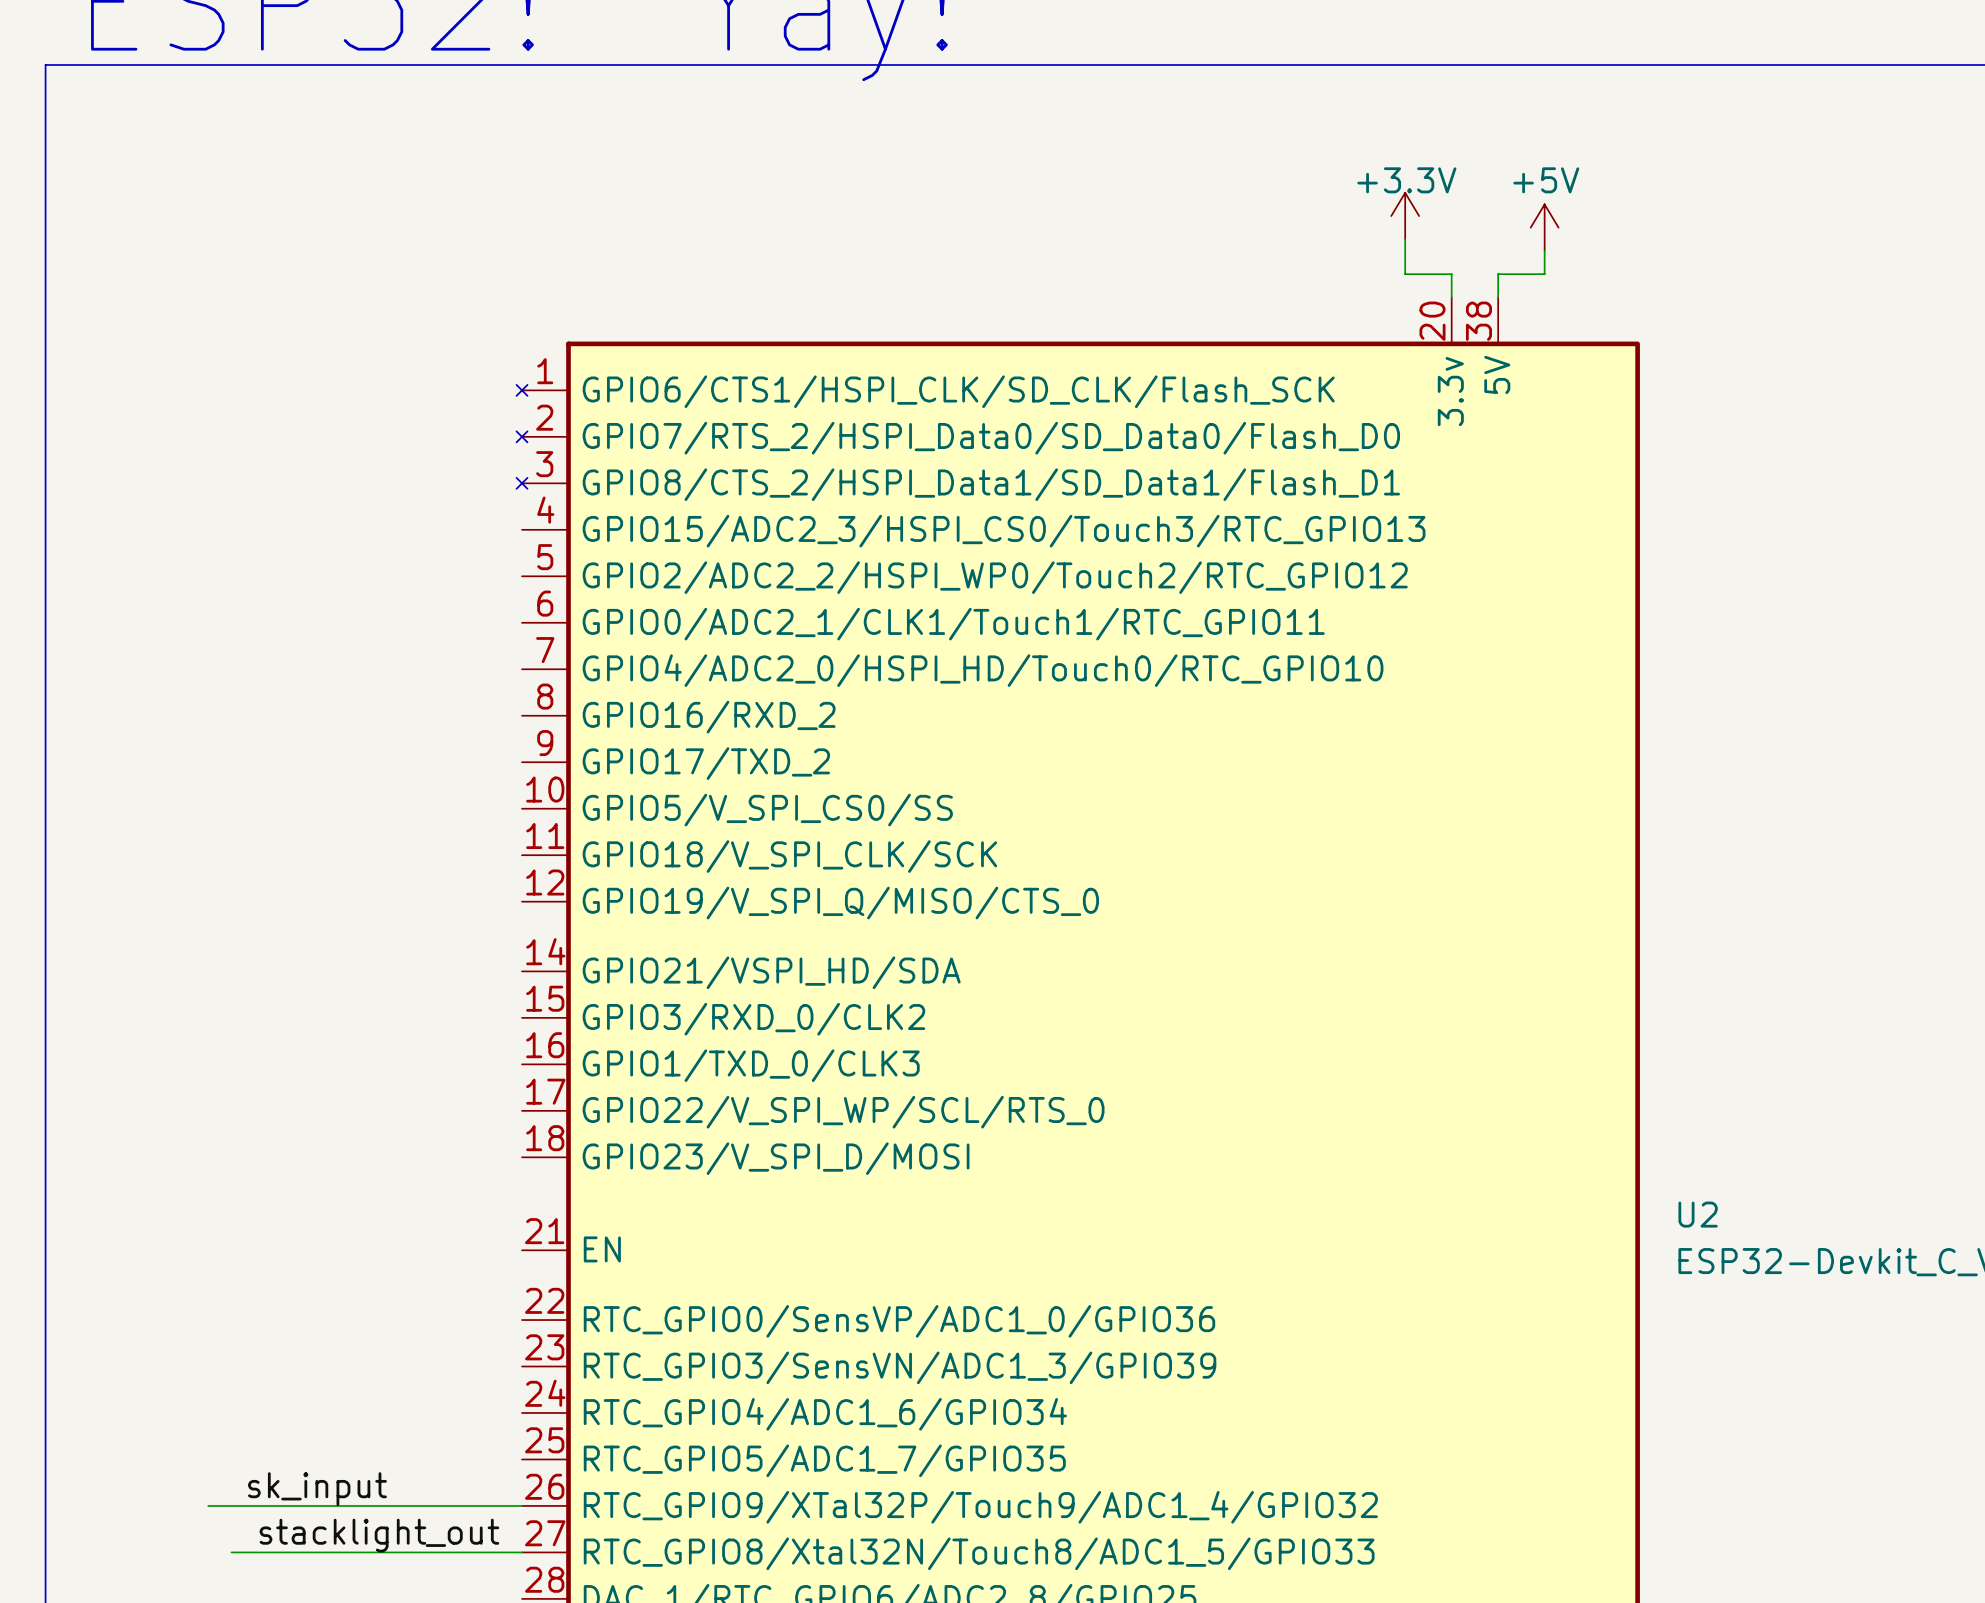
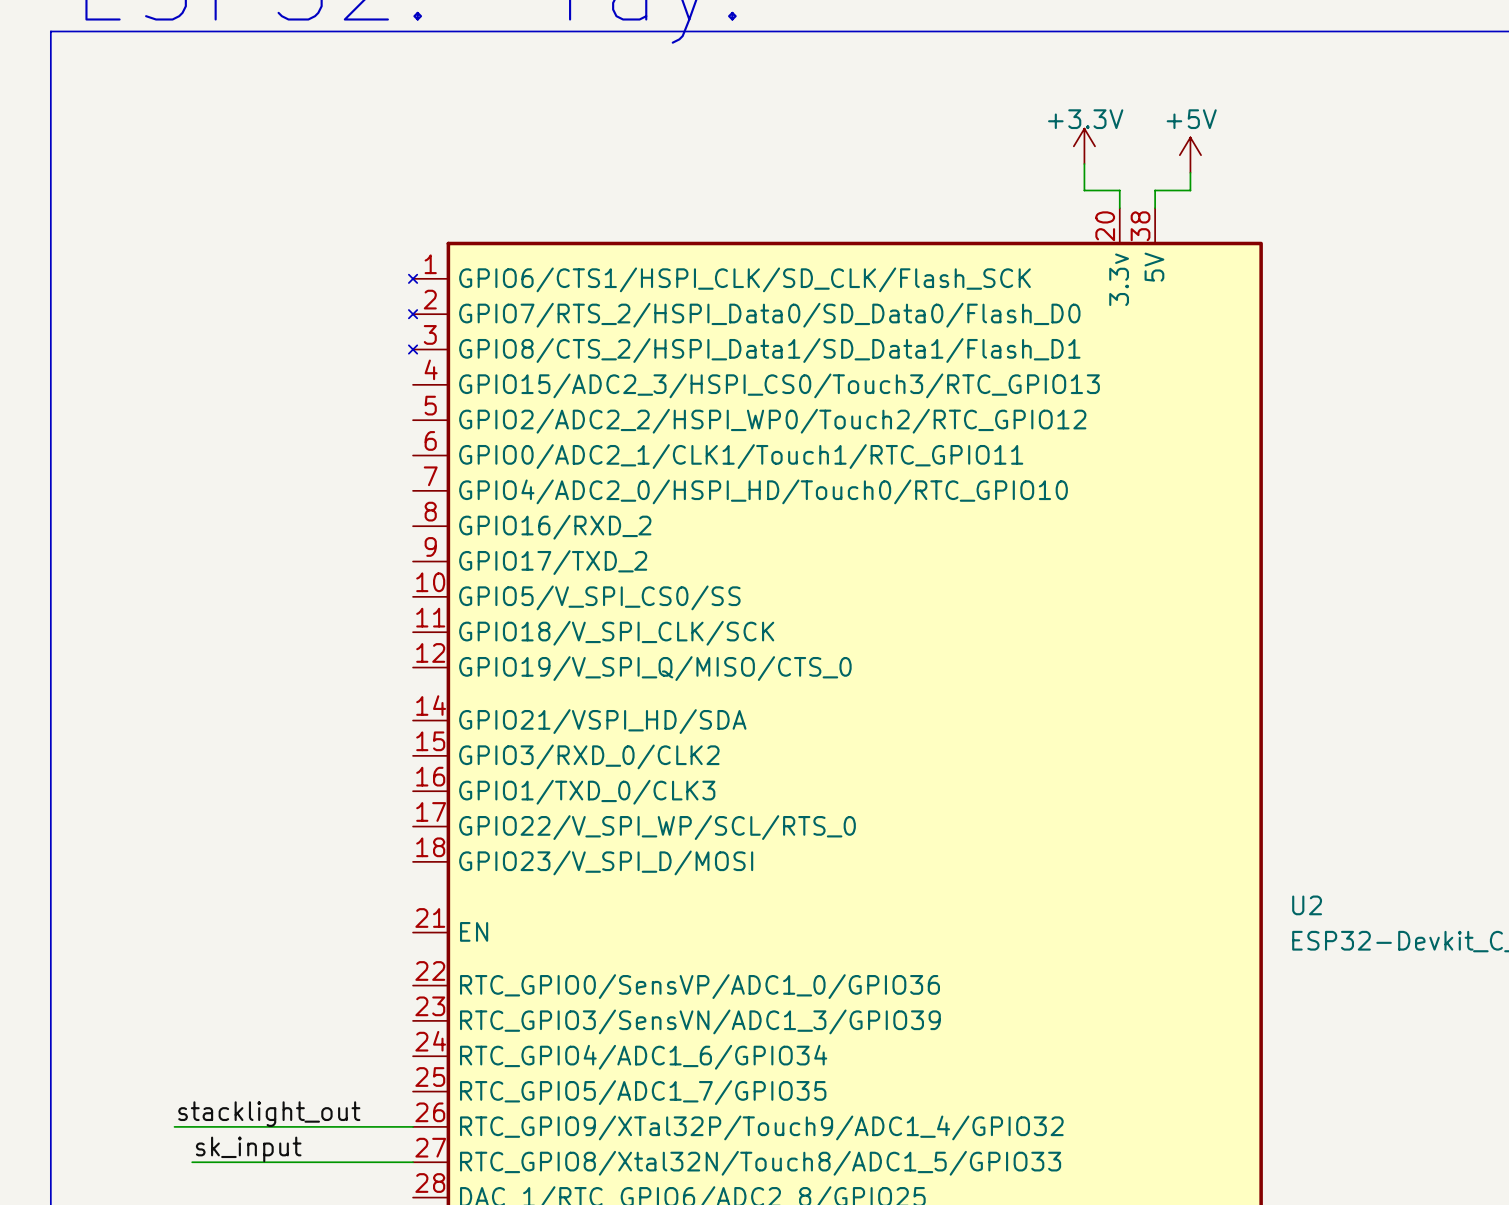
label position: sk_input (317, 1489) -> sk_input (248, 1149)
label position: stacklight_out (379, 1535) -> stacklight_out (269, 1114)

